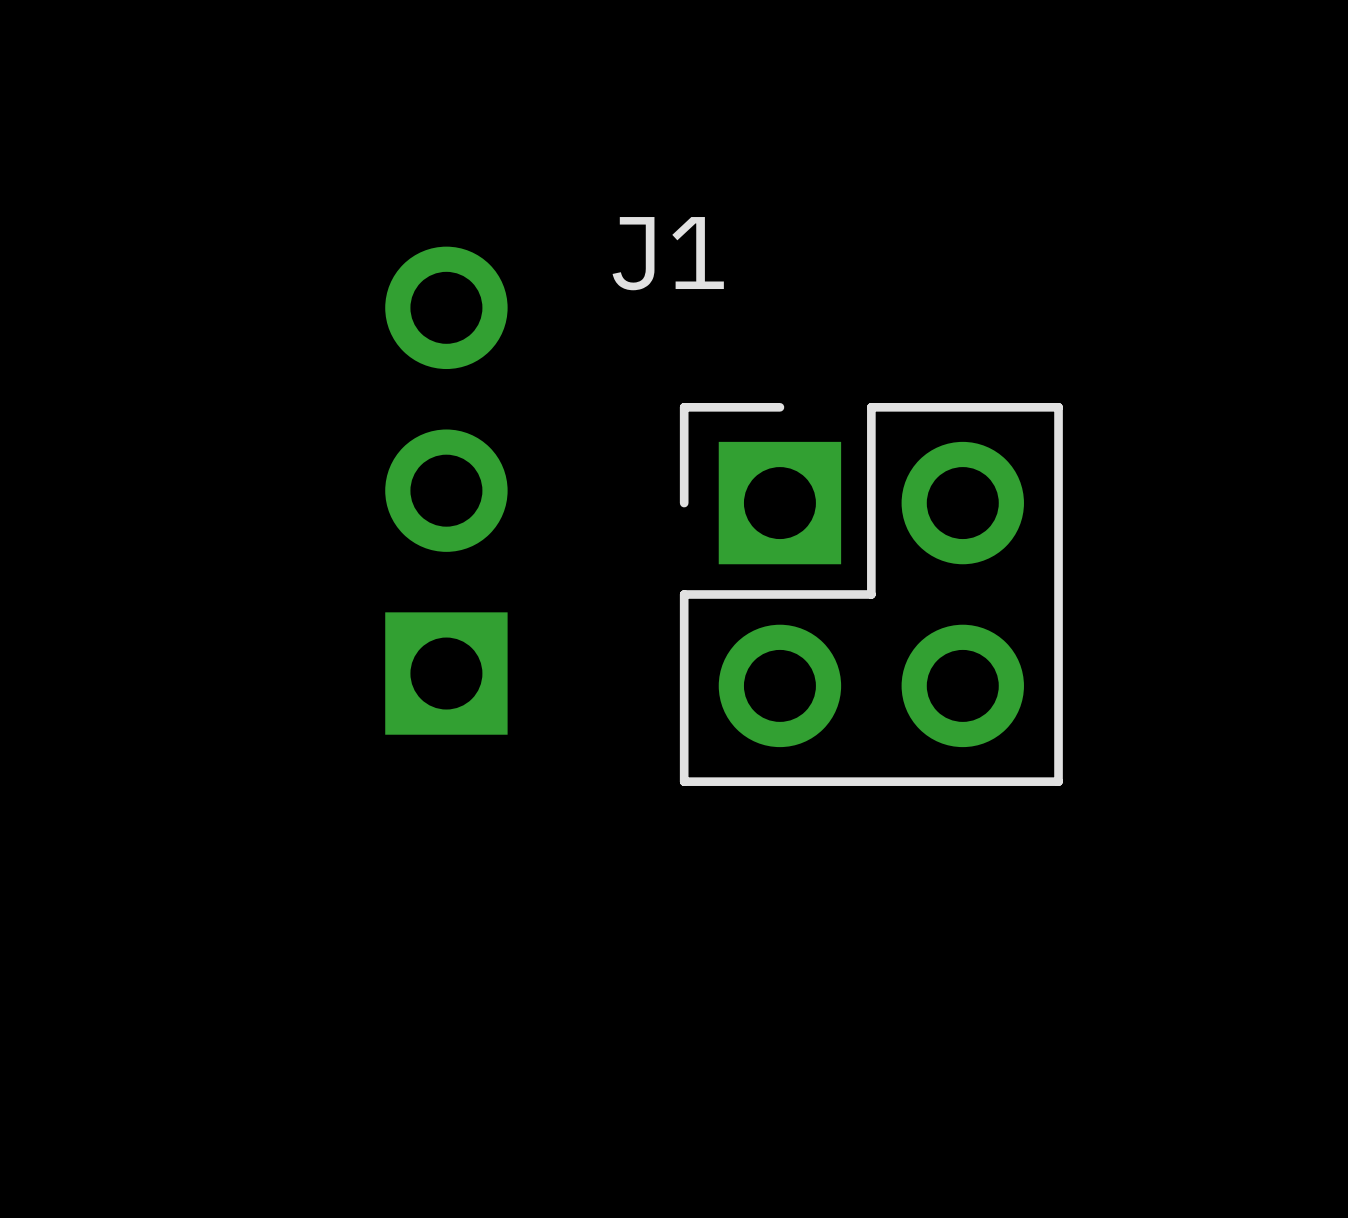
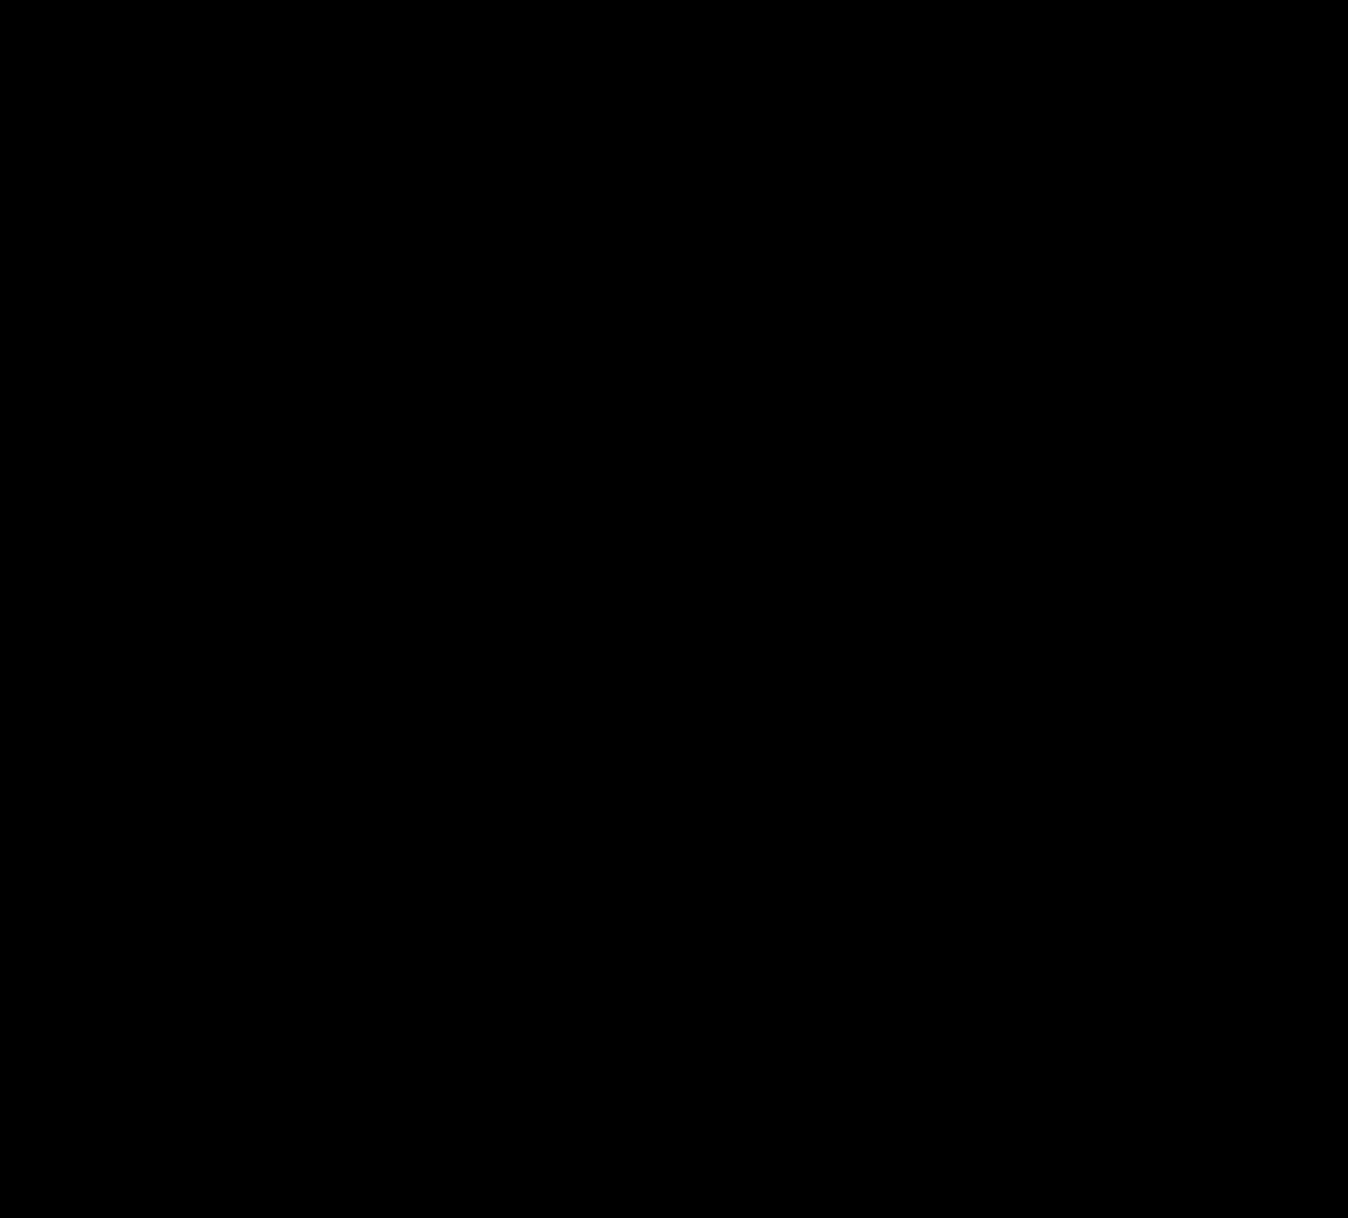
part: (446, 490) -> none
J1: (871, 594) -> none

